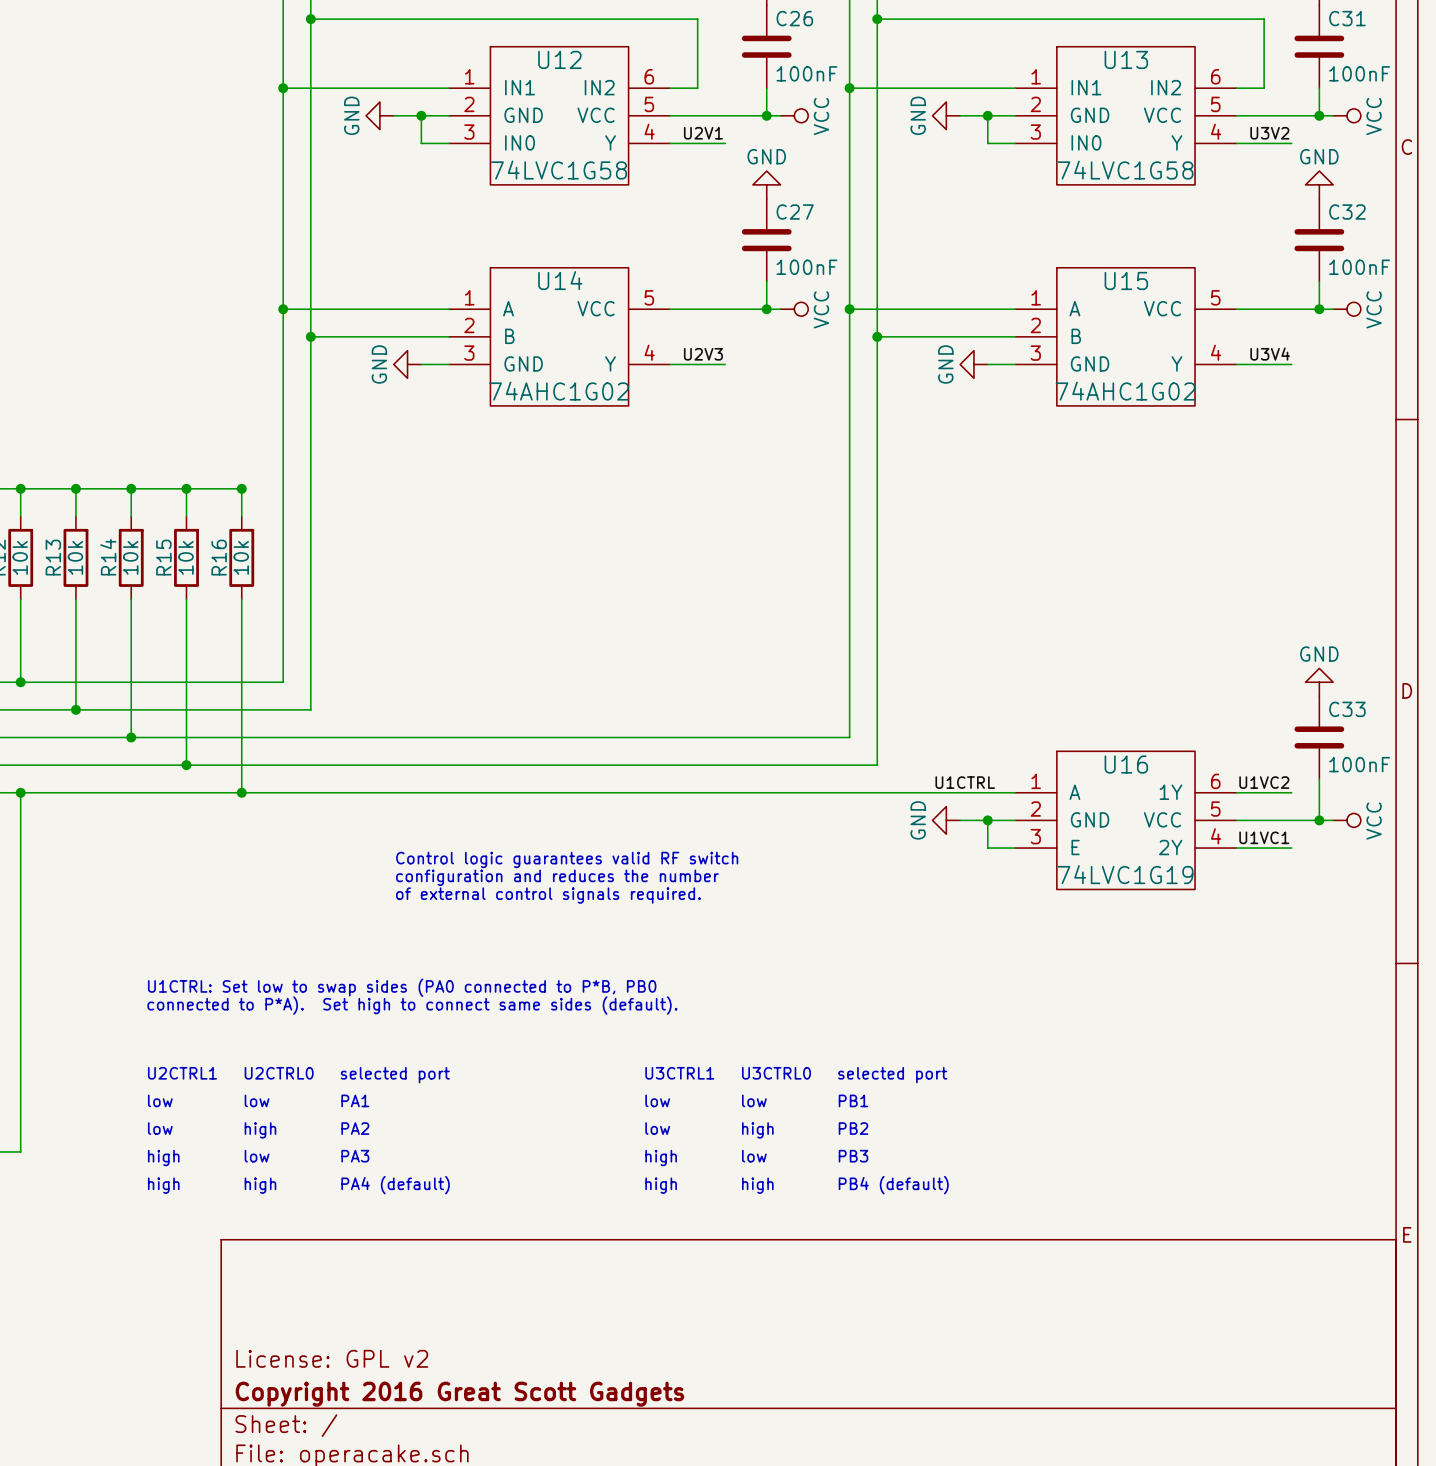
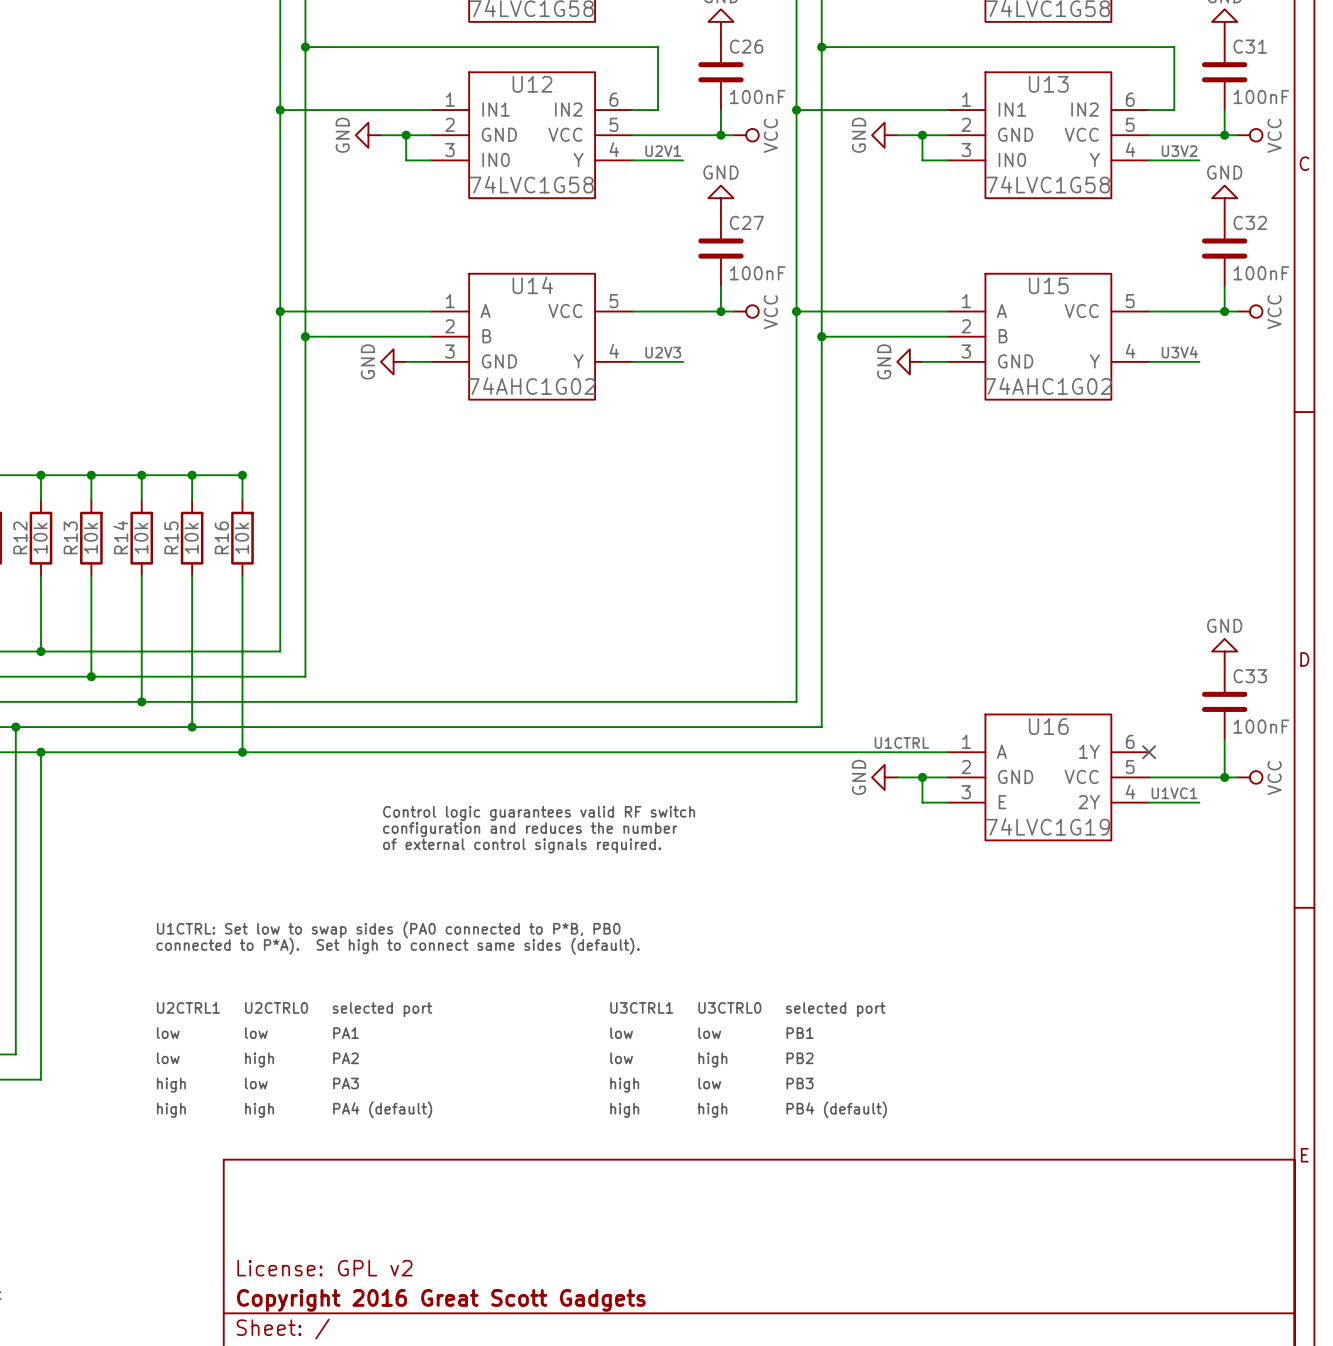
label: U1VC2 (1264, 782) -> none
wire: (1236, 792) (1291, 792) -> none
no-connect mark: none -> (1149, 752)

